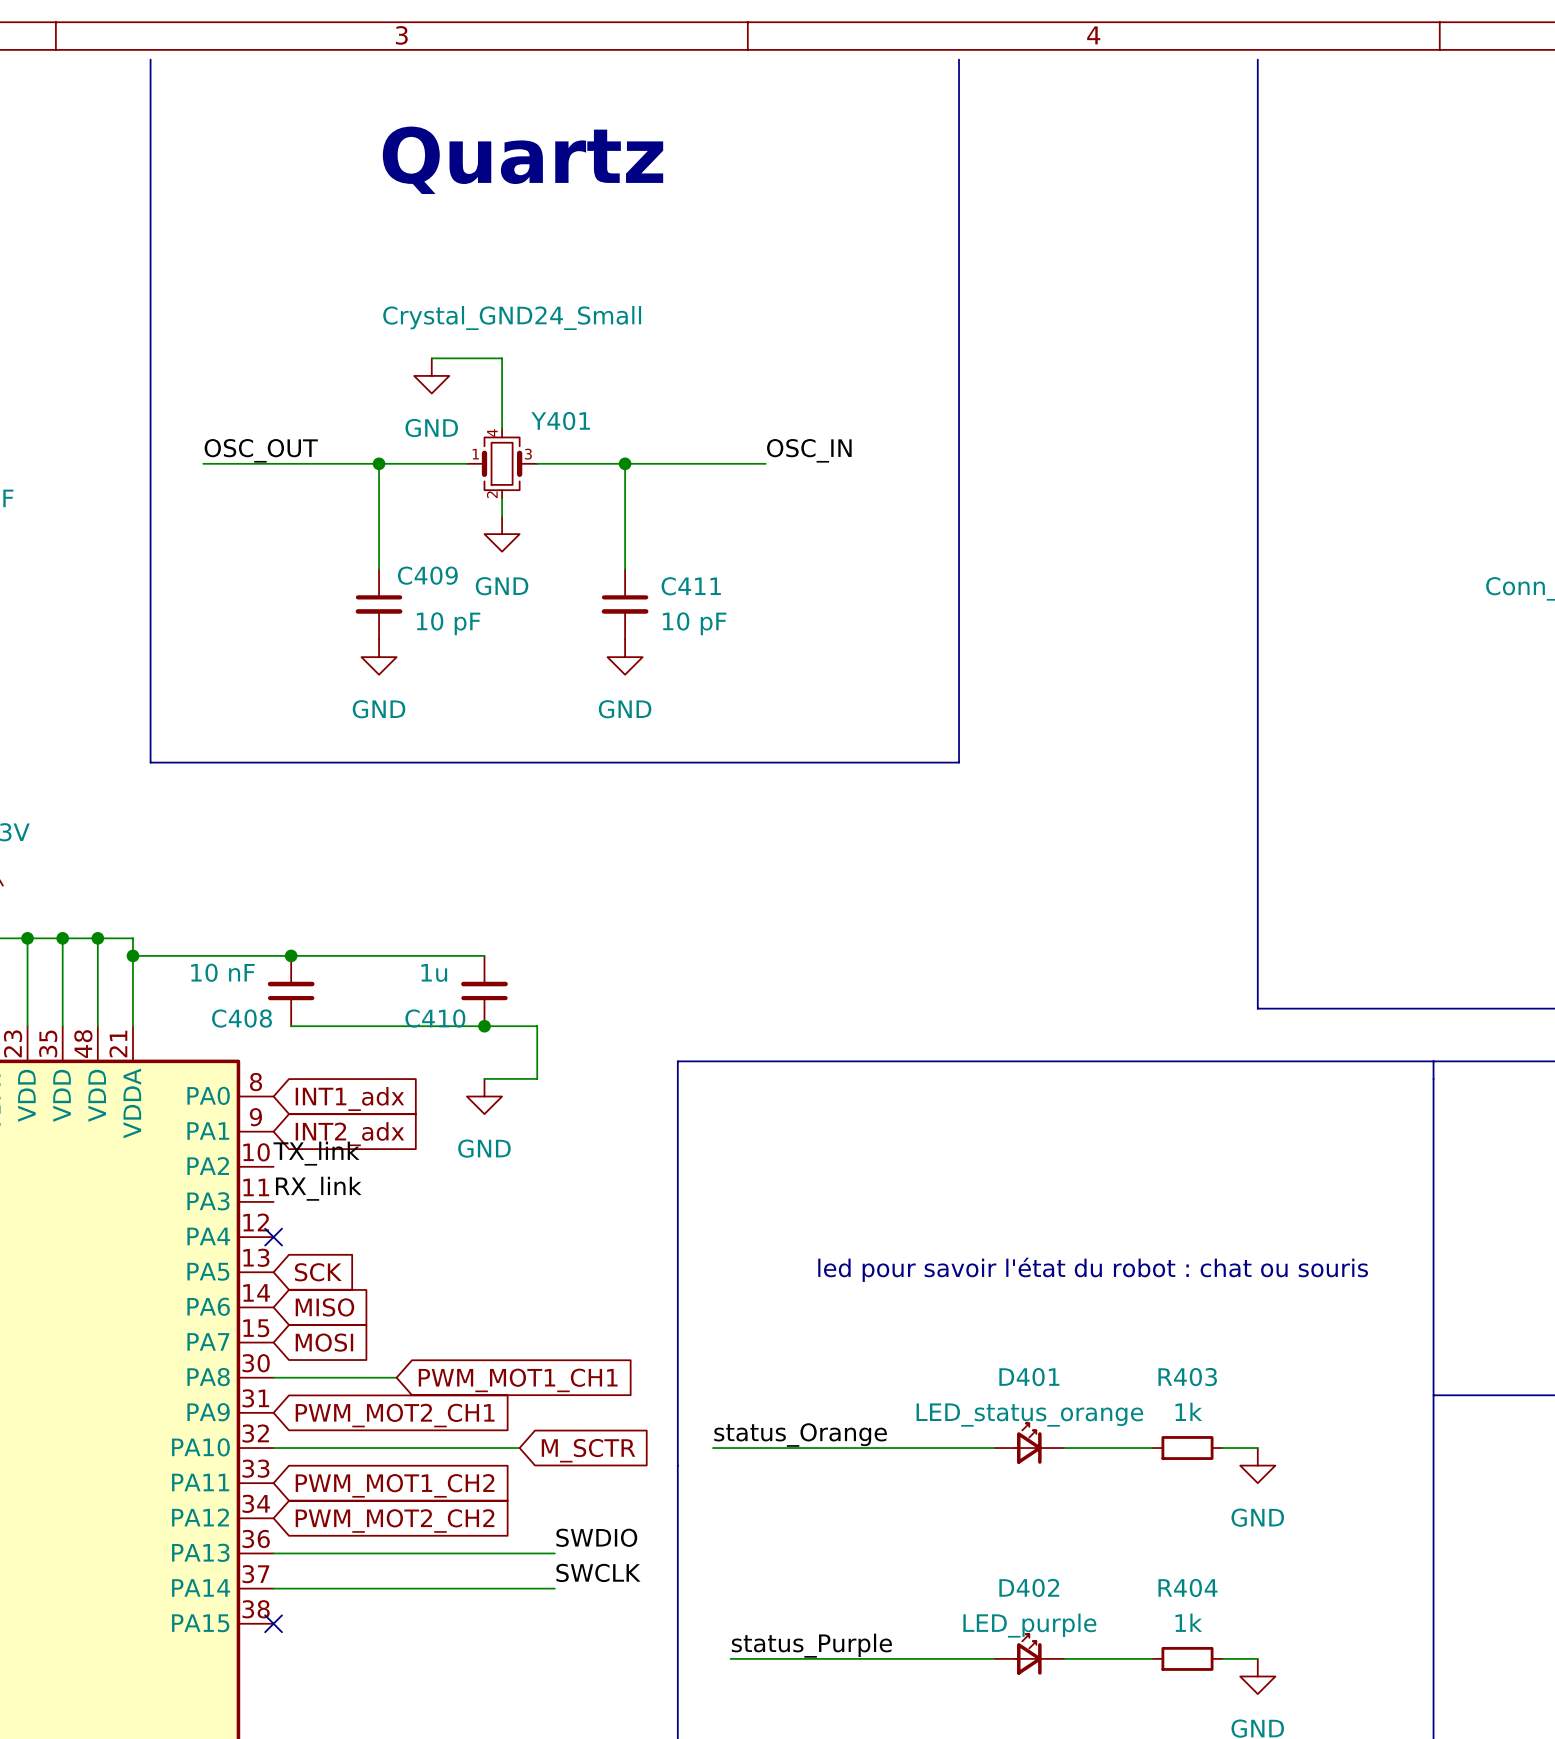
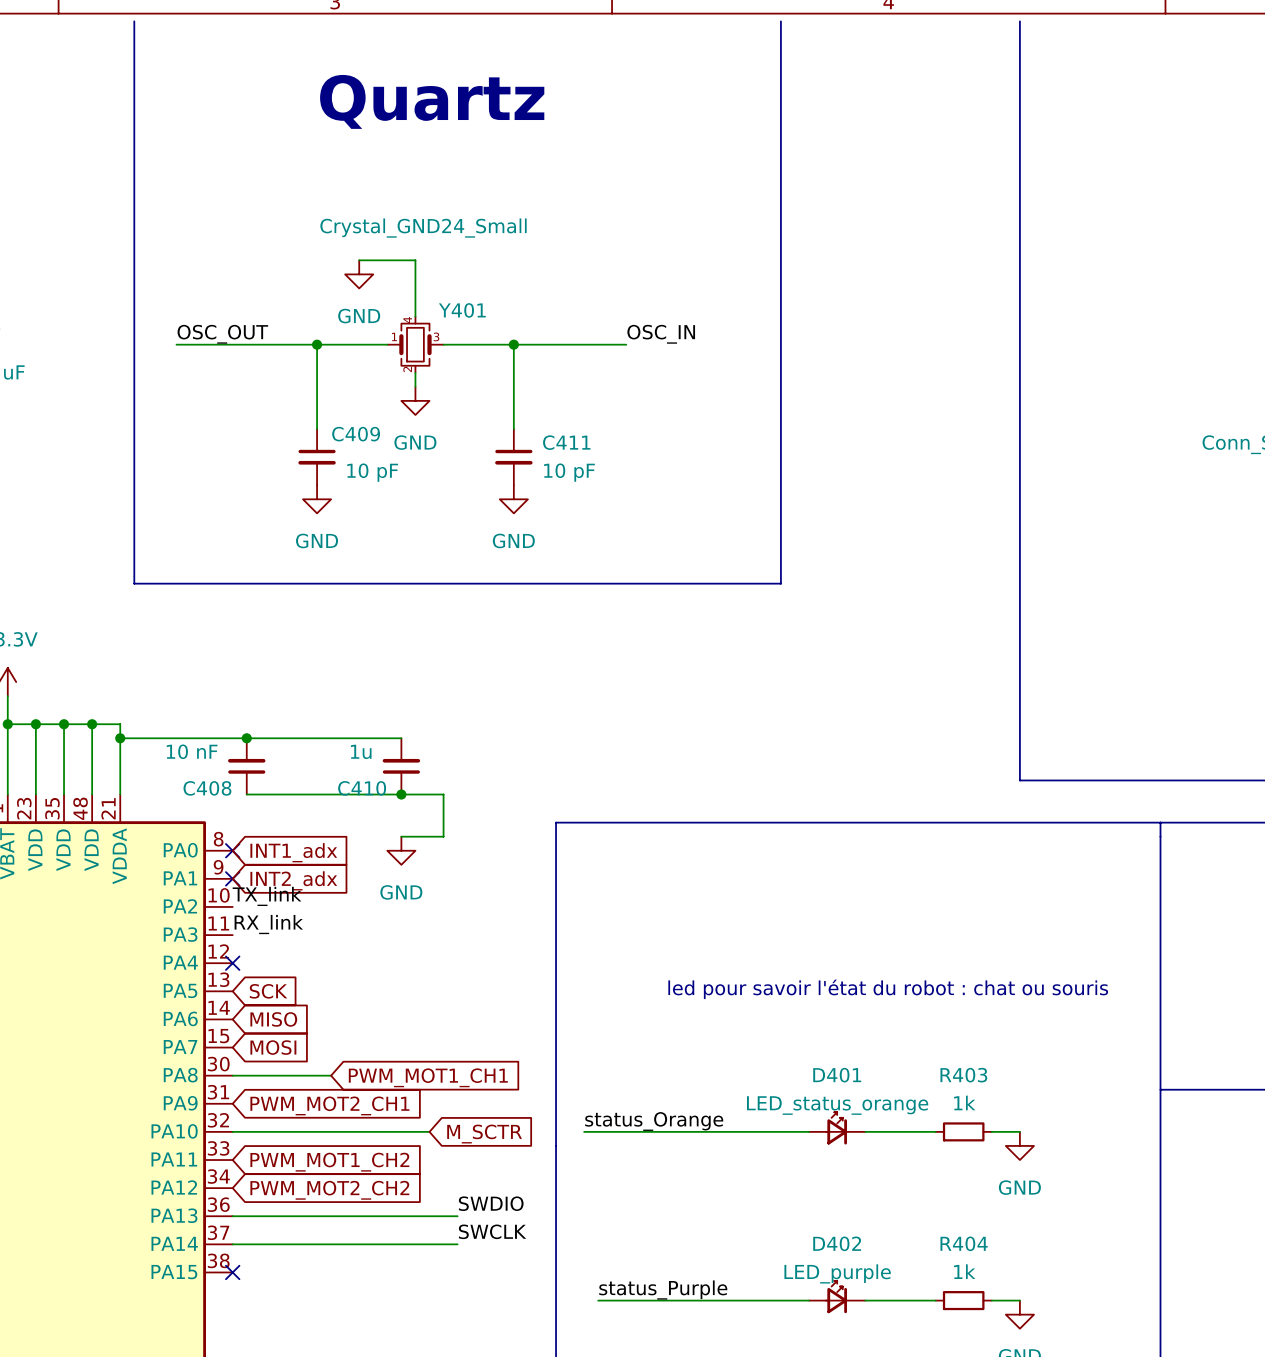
no-connect mark: none -> (232, 850)
no-connect mark: none -> (232, 878)

